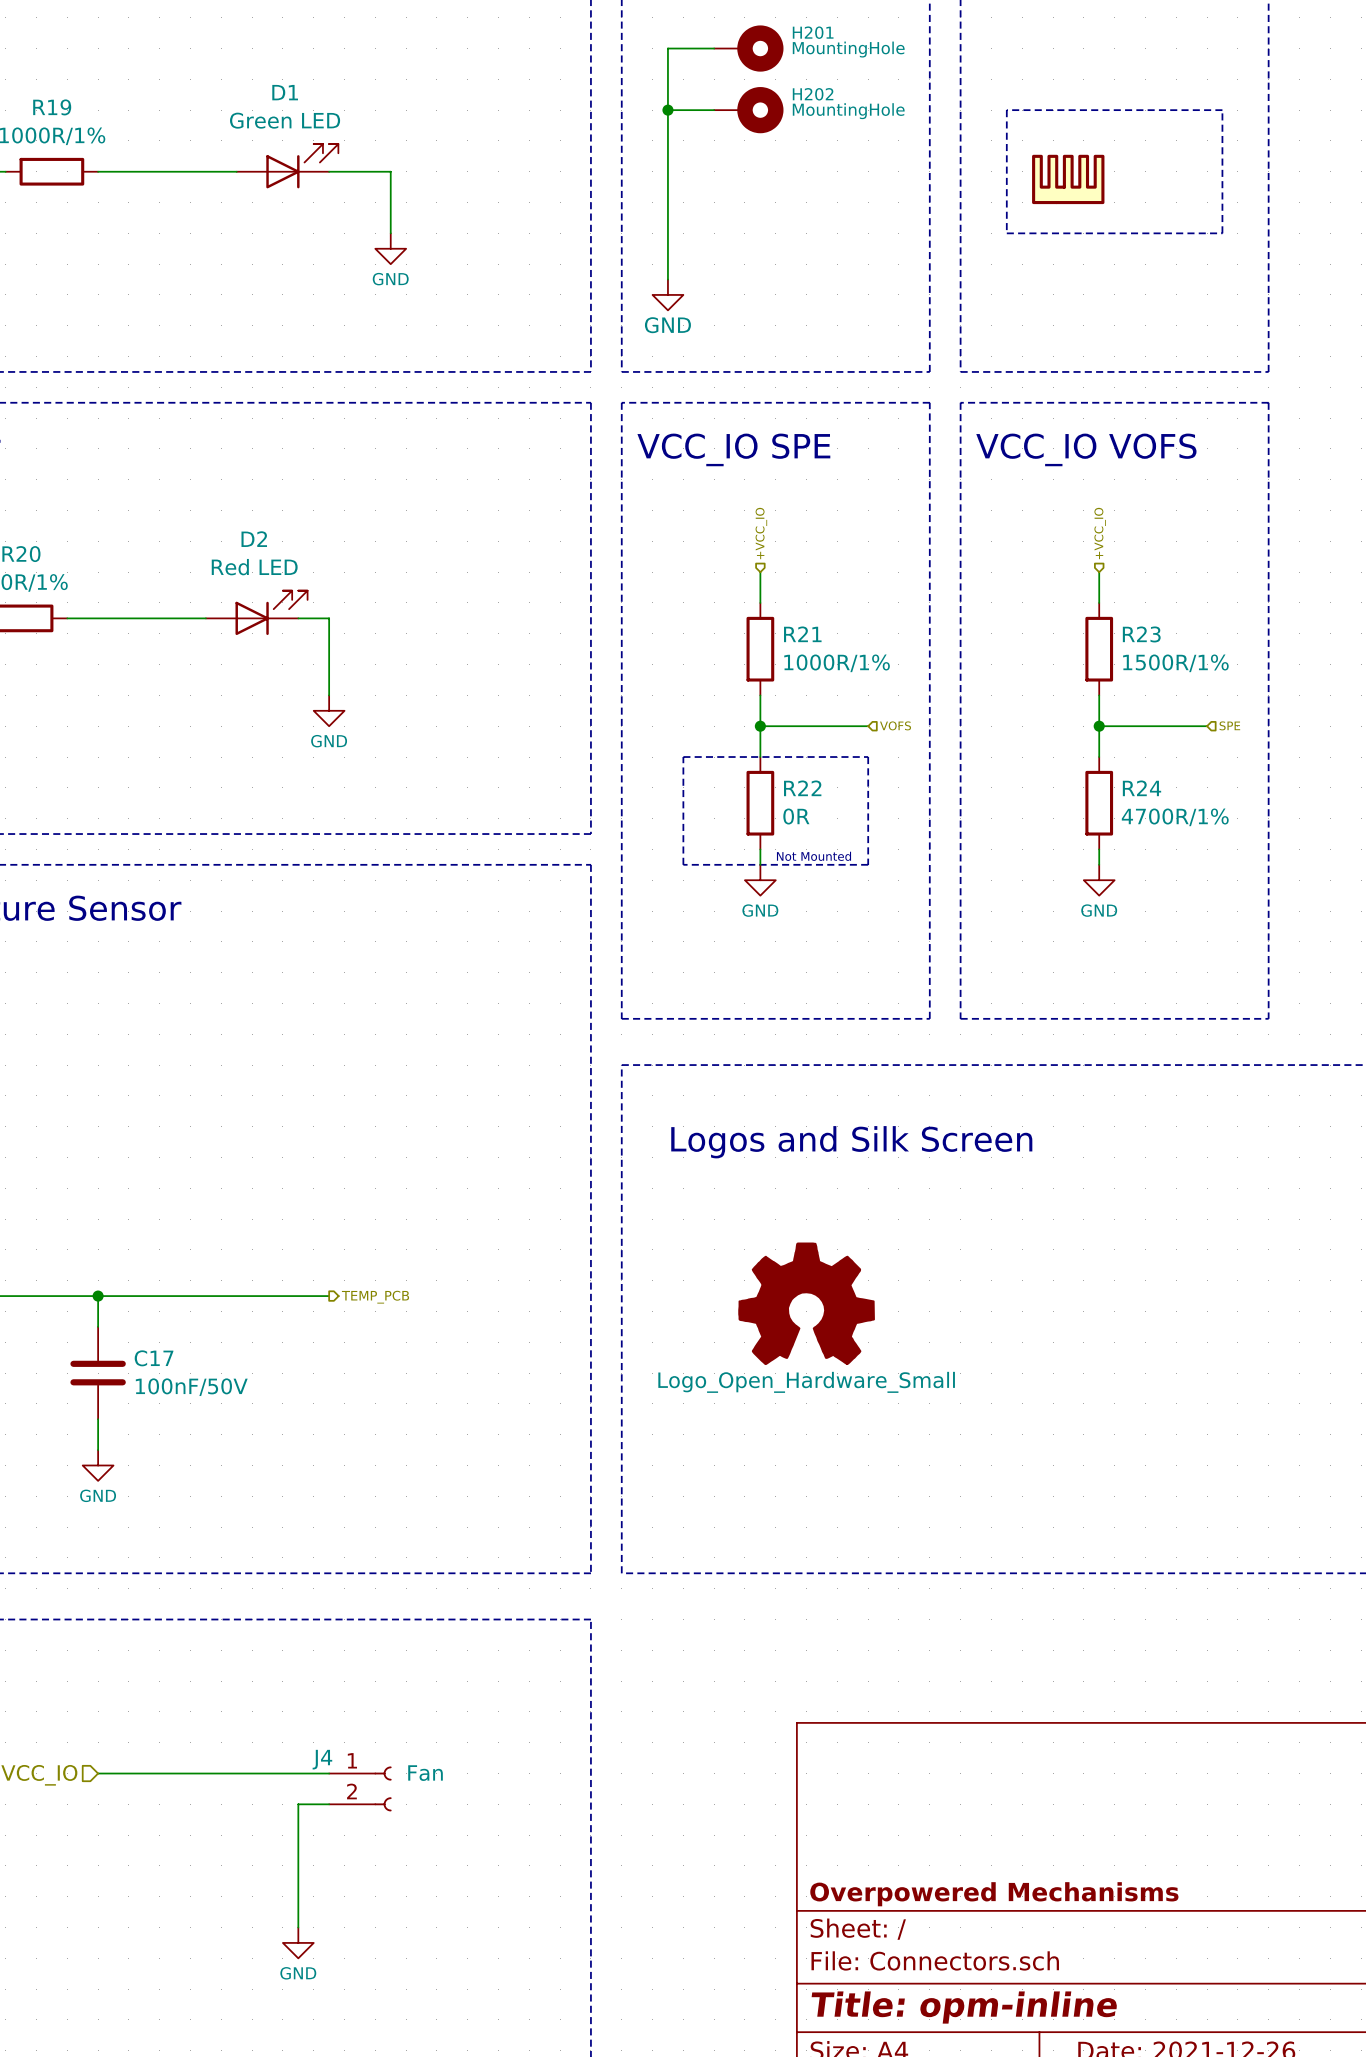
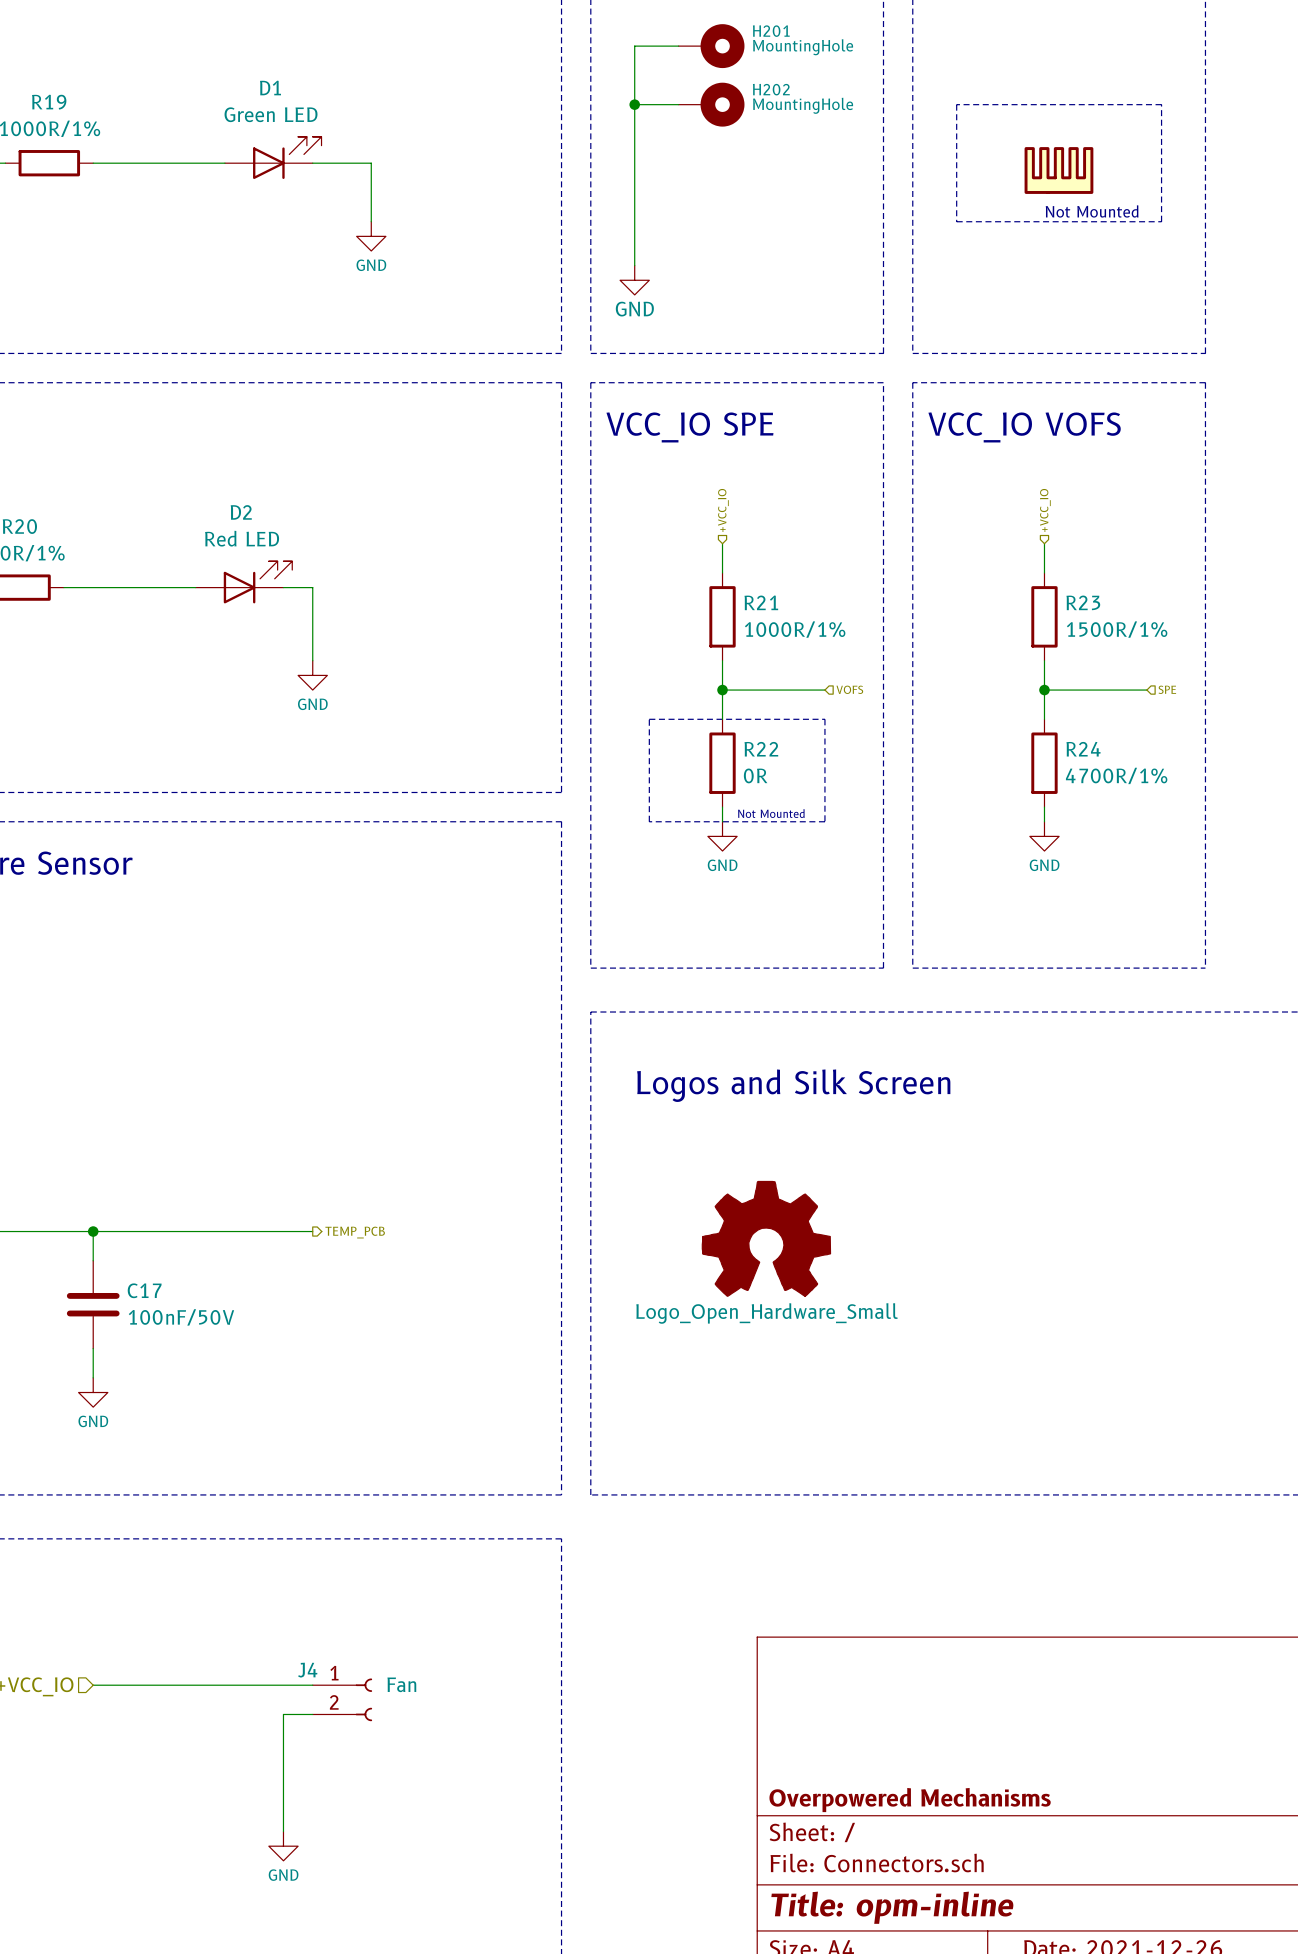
part position: (1068, 179) -> (1058, 170)
text: none -> Not Mounted (1092, 211)

